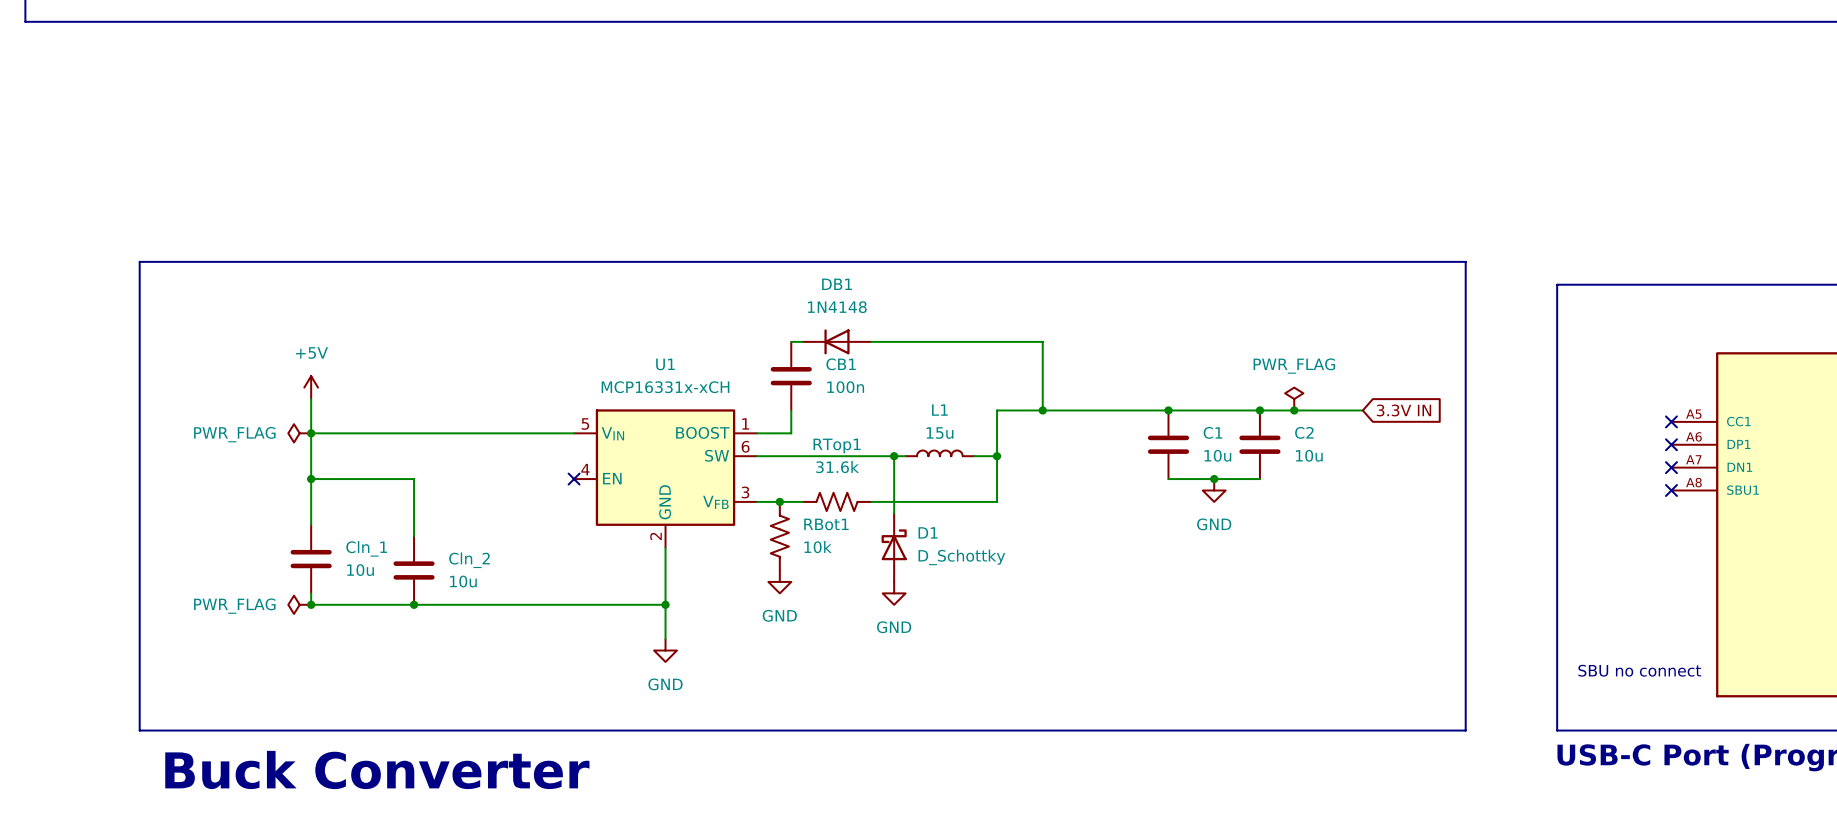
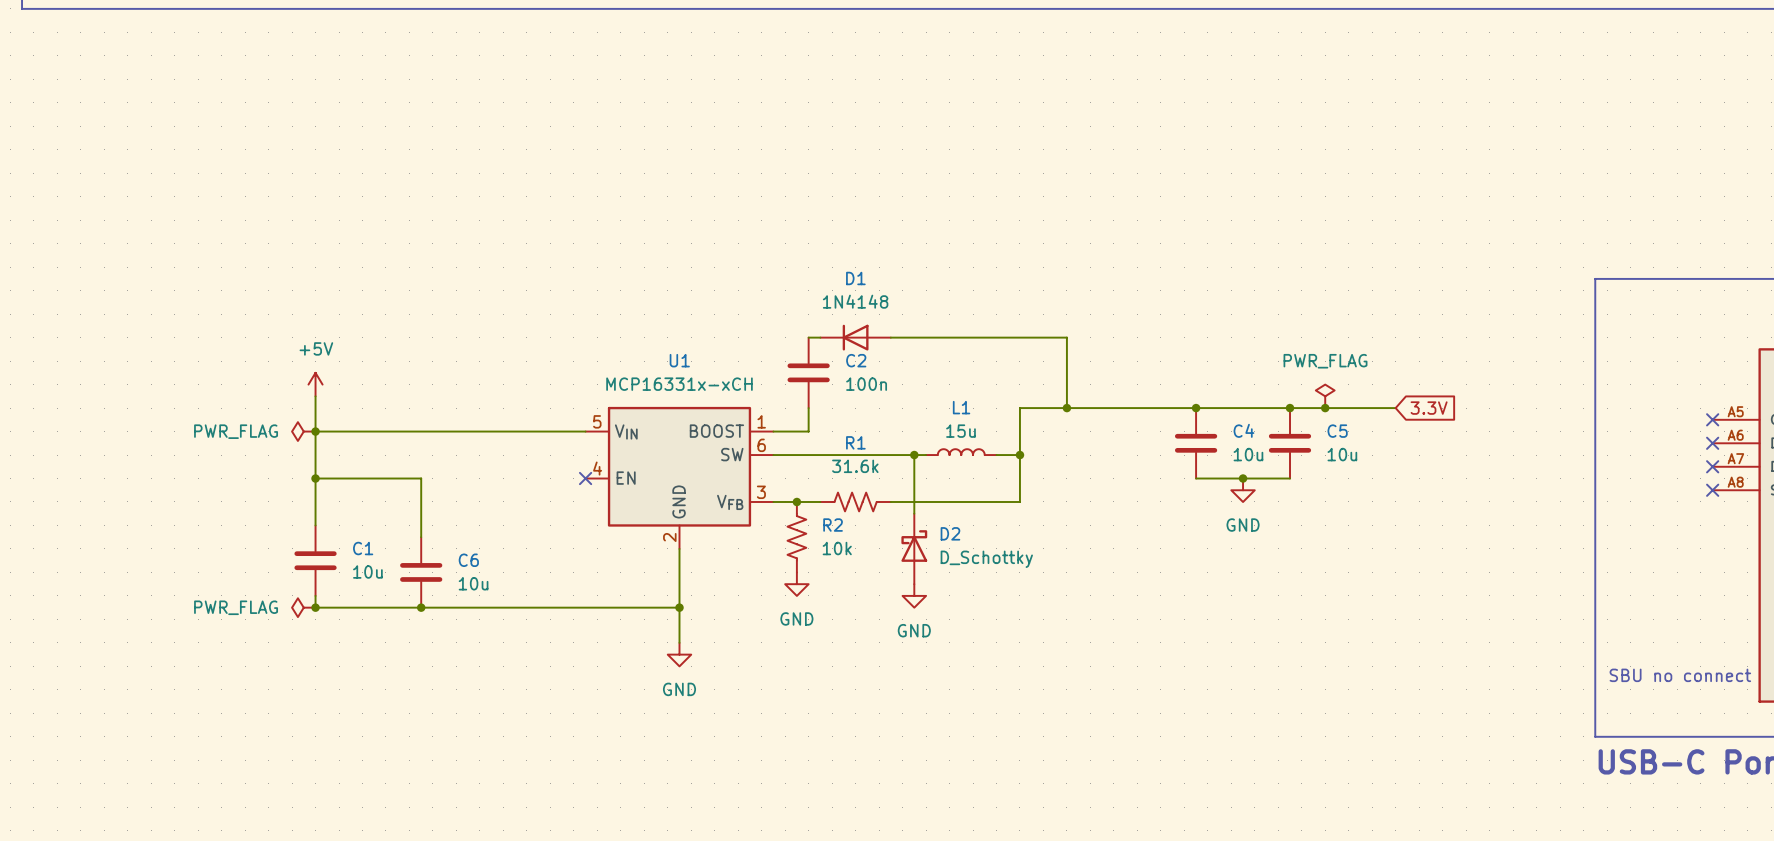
line: (139, 261) (1465, 261) (1465, 730) (139, 730) (139, 261) -> none
DB1 name: DB1 (837, 284) -> D1 (855, 278)
CB1 name: CB1 (841, 364) -> C2 (856, 360)
global label: 3.3V IN (1404, 410) -> 3.3V (1429, 408)
C1 name: C1 (1212, 432) -> C4 (1243, 430)
C2 name: C2 (1304, 432) -> C5 (1337, 431)
RTop1 name: RTop1 (837, 445) -> R1 (855, 442)
RBot1 name: RBot1 (826, 524) -> R2 (833, 525)
D1 name: D1 (928, 532) -> D2 (950, 533)
Cln_1 name: Cln_1 (366, 548) -> C1 (363, 548)
Cln_2 name: Cln_2 (469, 560) -> C6 (468, 560)
text: Buck Converter (377, 769) -> none

